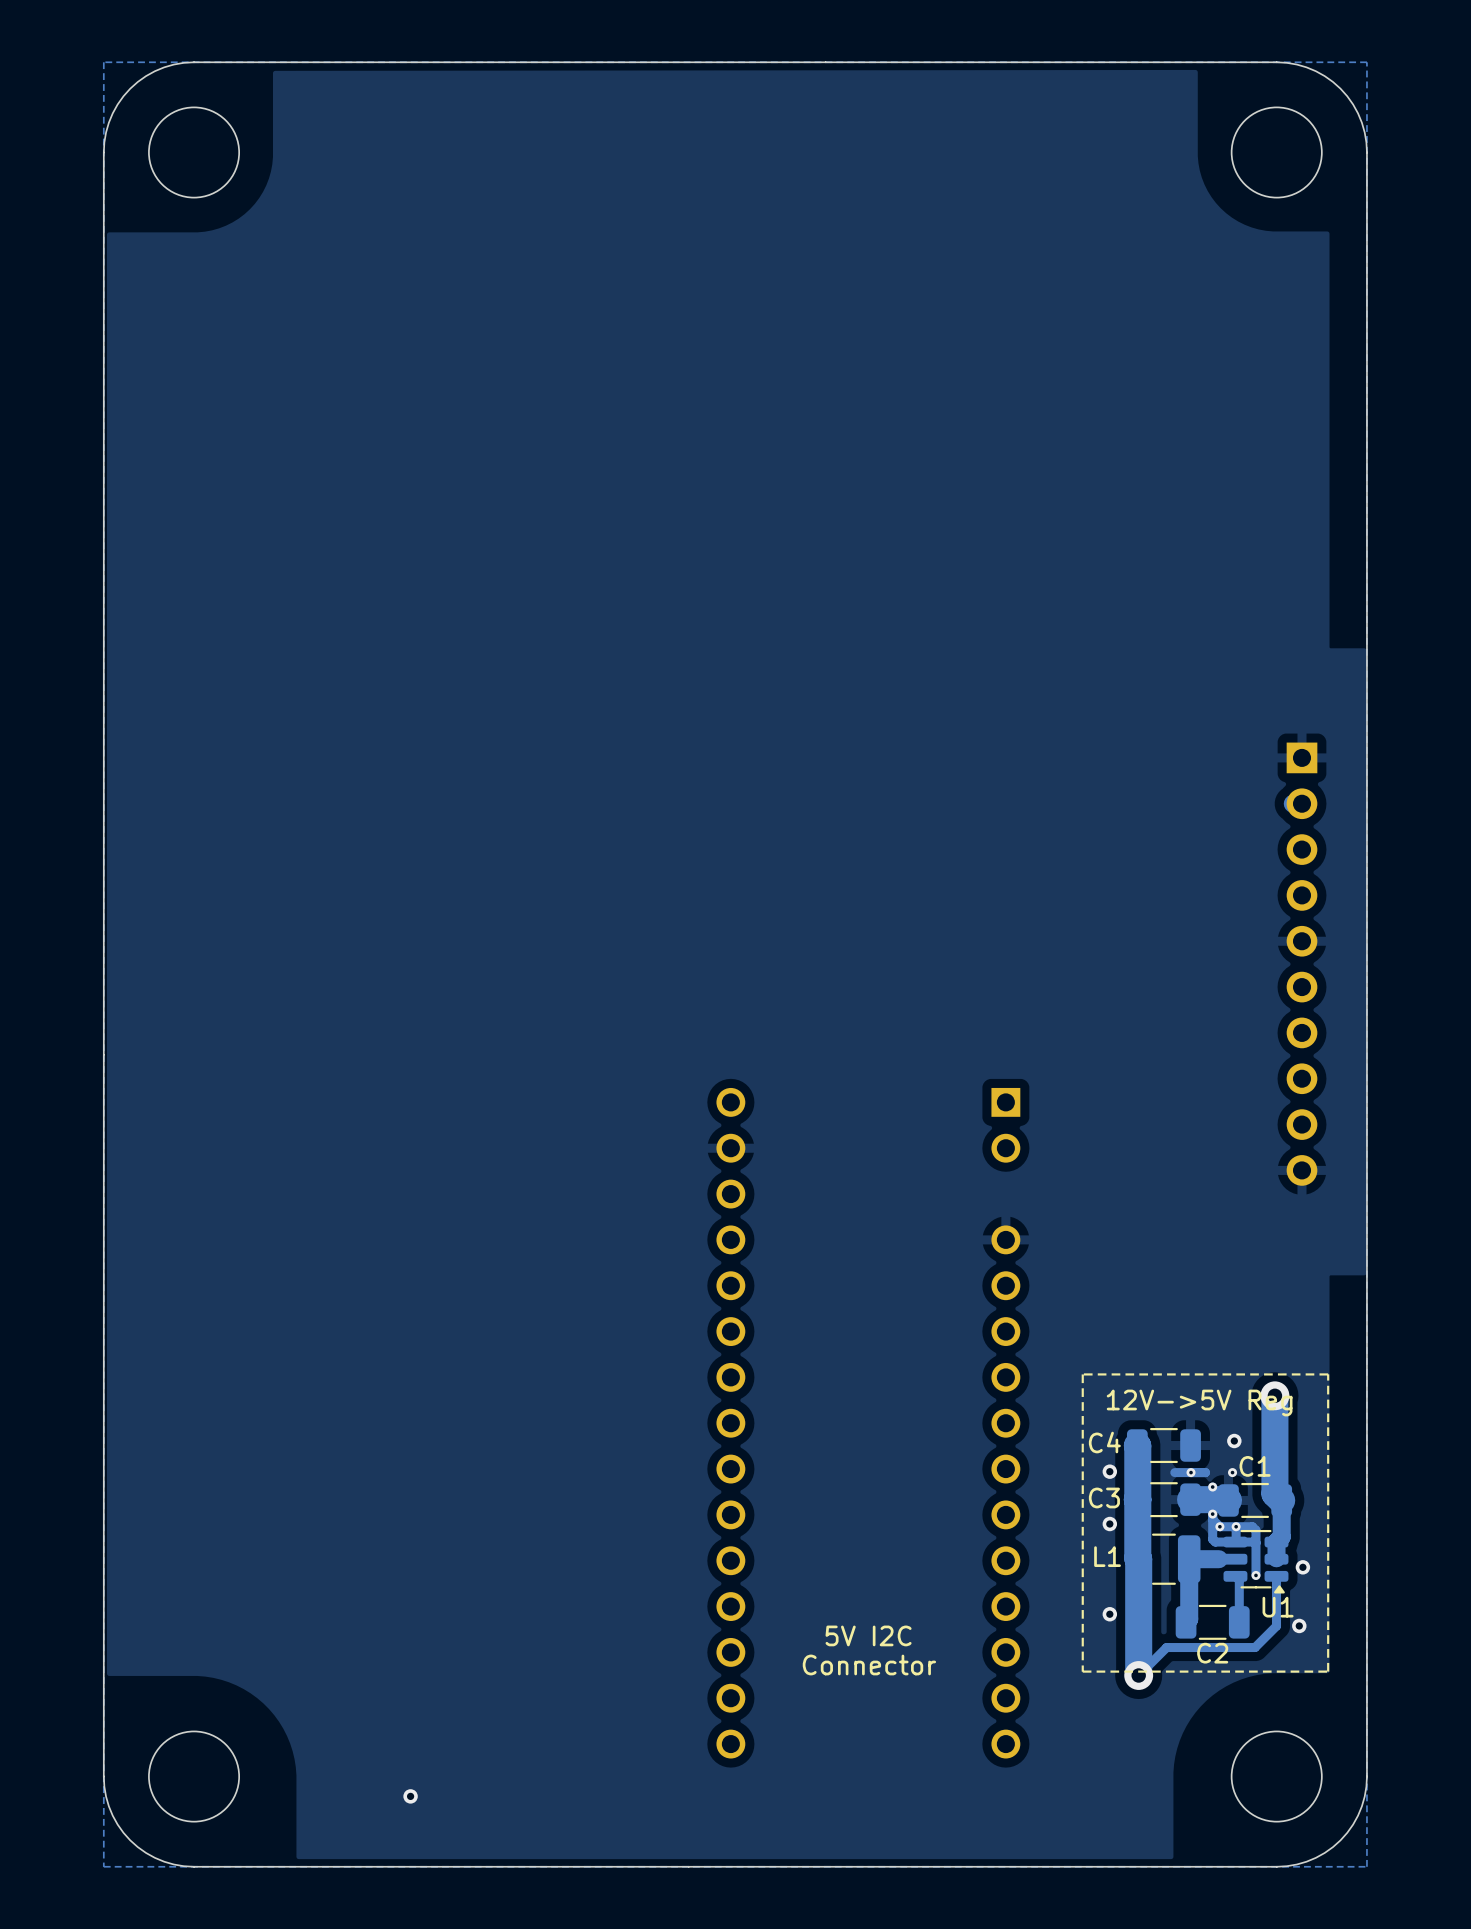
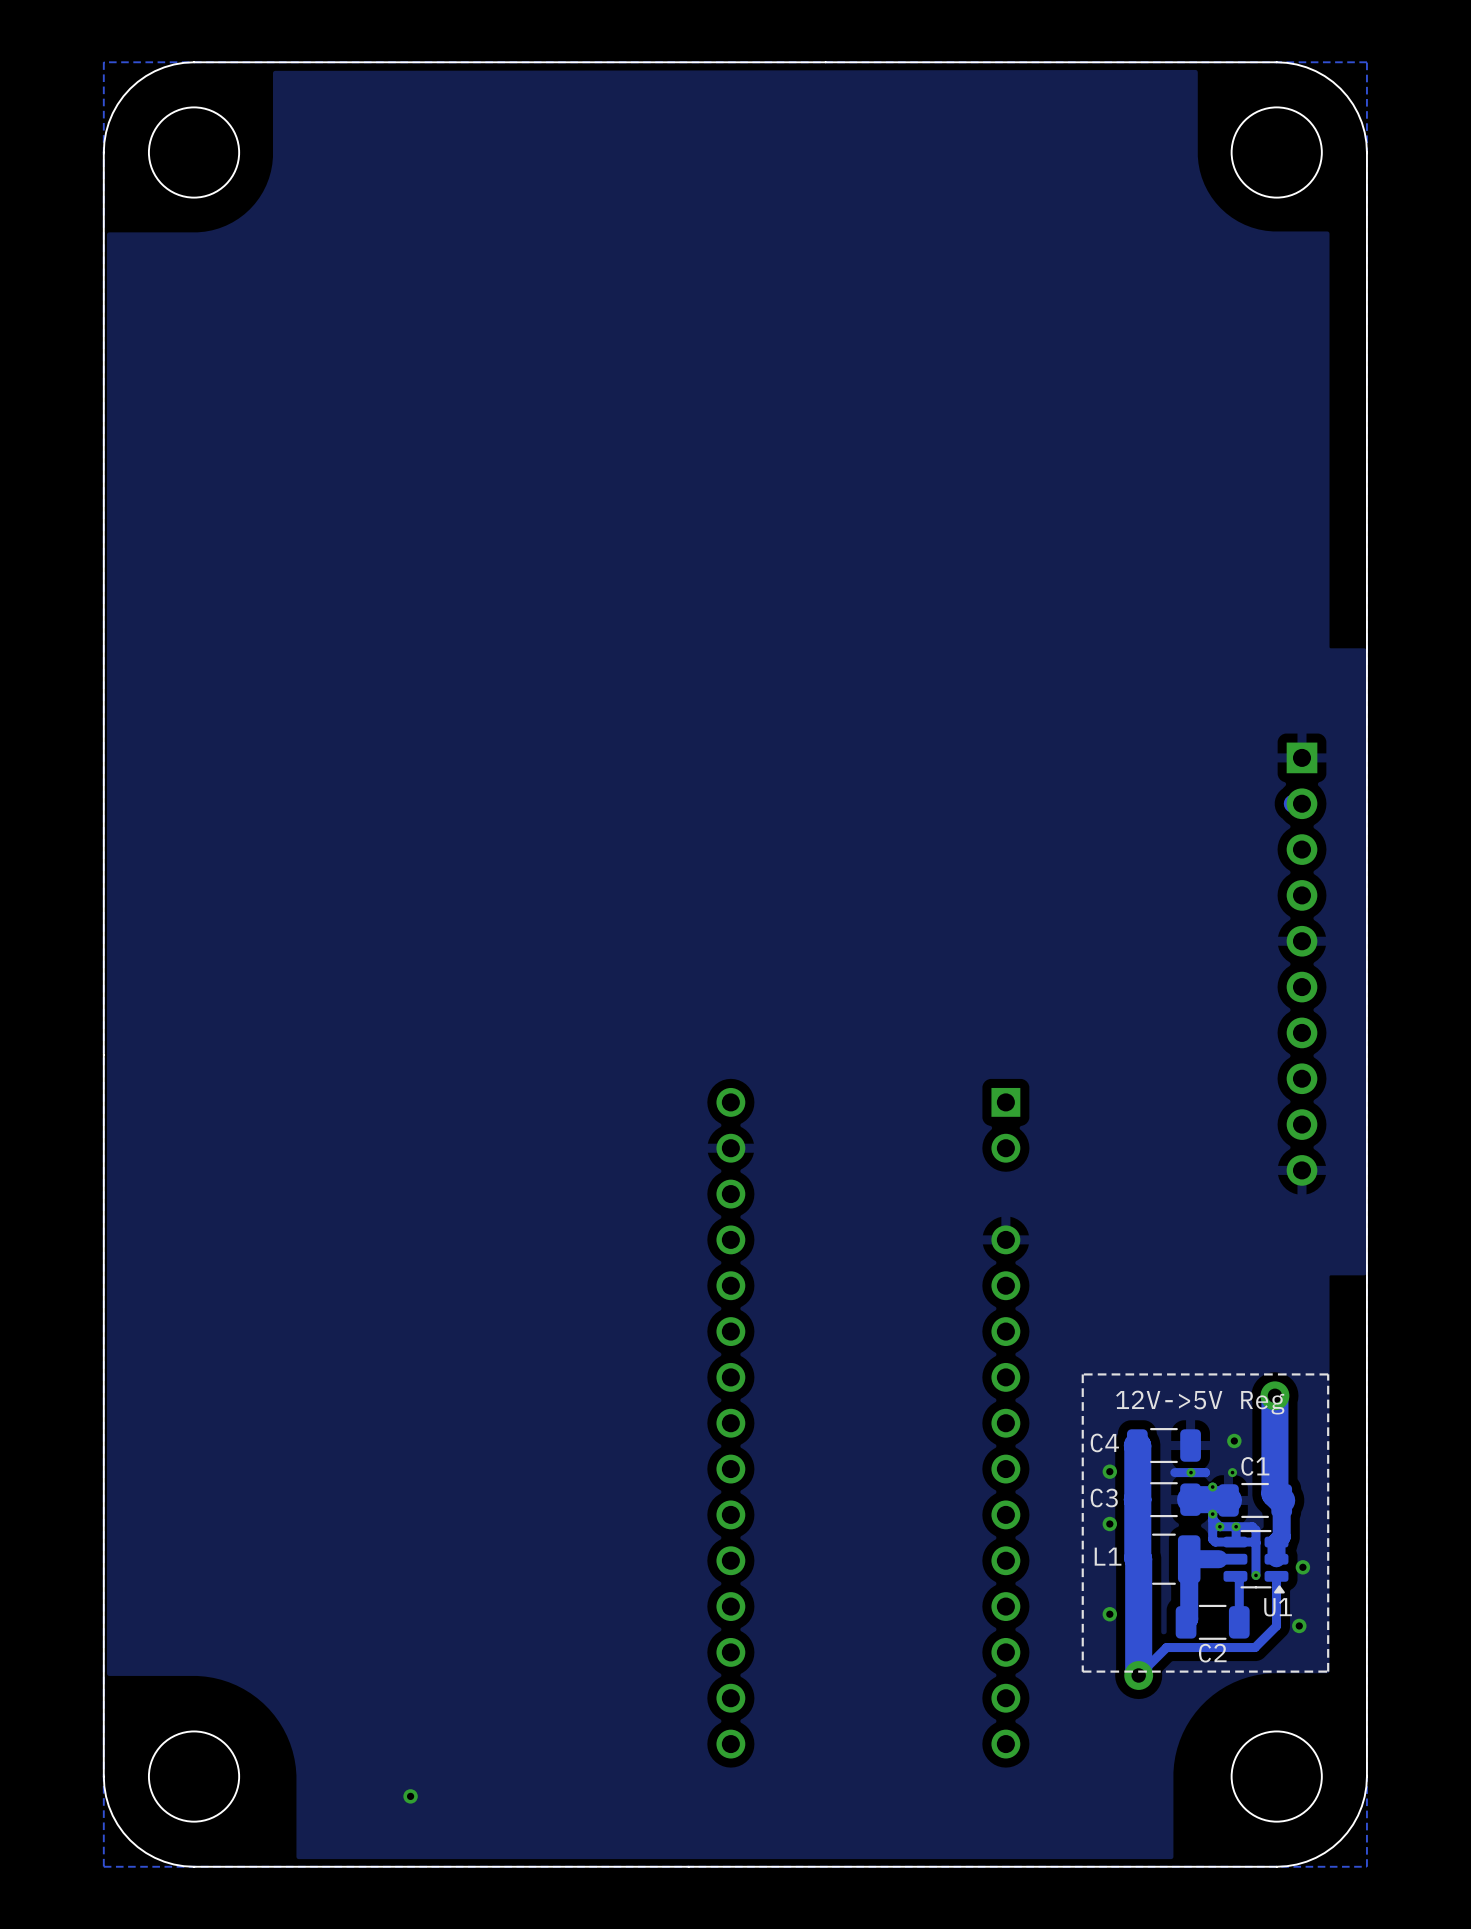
text: 5V I2C (868, 1635) -> none
text: Connector (869, 1664) -> none

